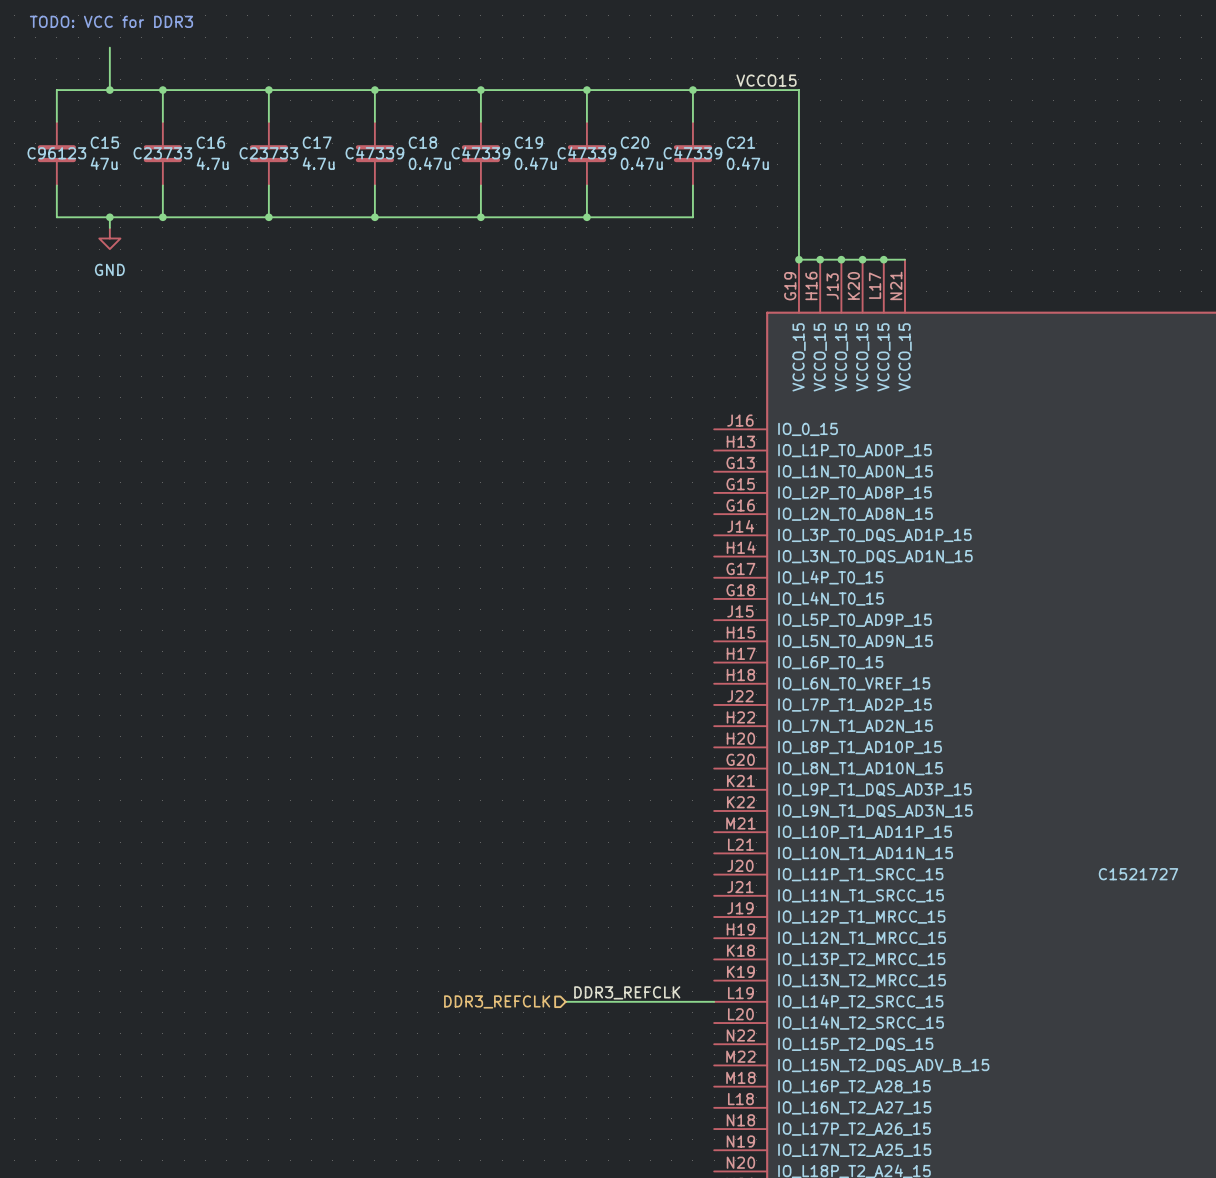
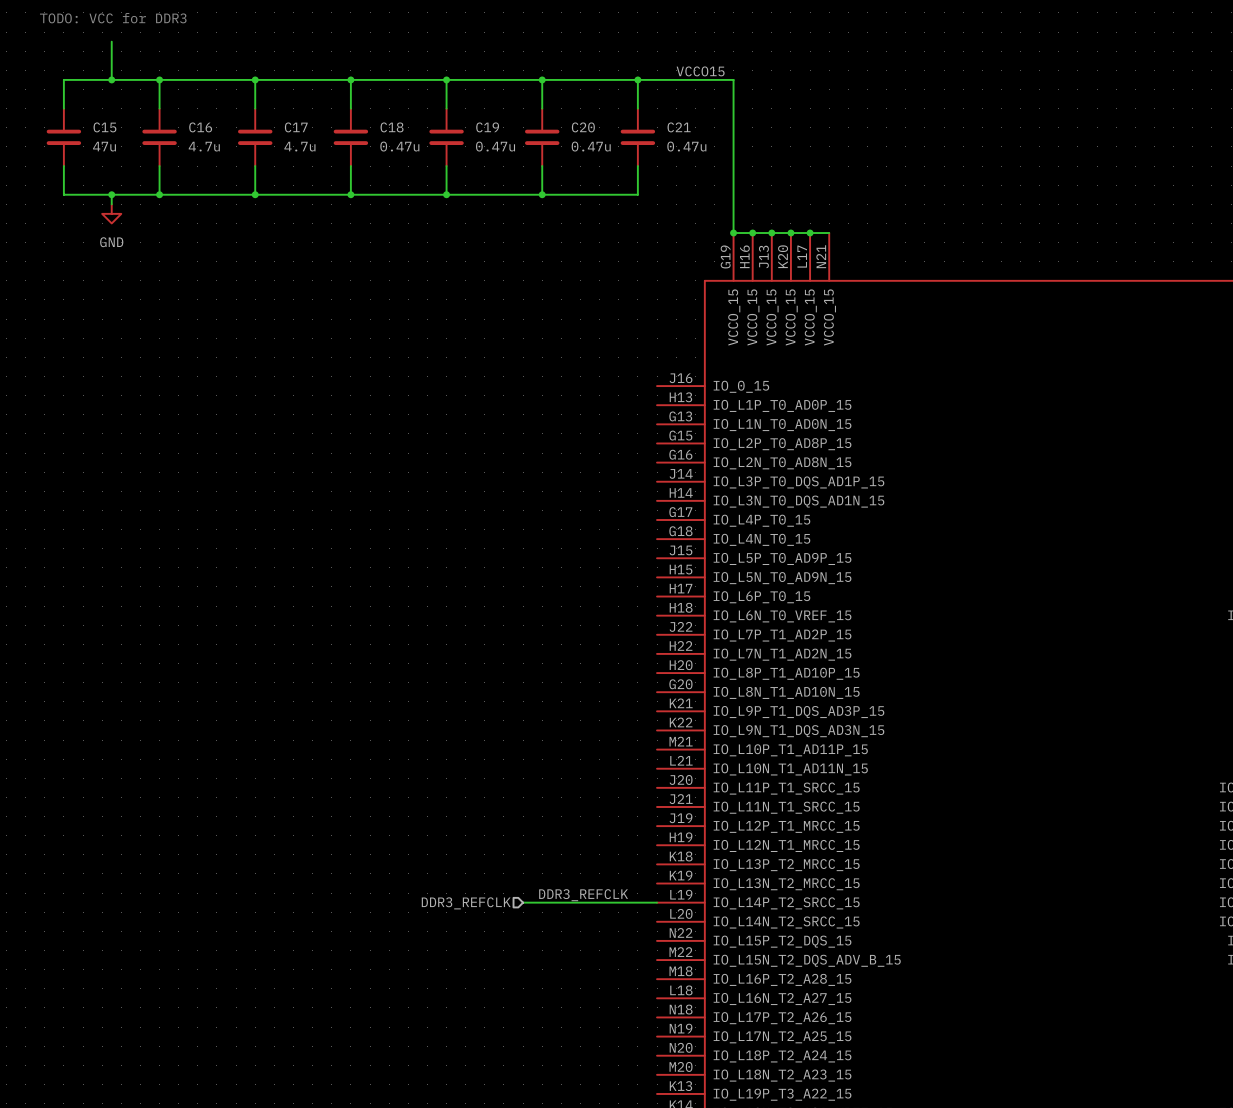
C15 text: C96123 (56, 153) -> none
C16 text: C23733 (162, 153) -> none
C17 text: C23733 (268, 153) -> none
C18 text: C47339 (374, 153) -> none
C19 text: C47339 (480, 153) -> none
C20 text: C47339 (586, 153) -> none
C21 text: C47339 (692, 153) -> none
part text: C1521727 (1138, 874) -> none

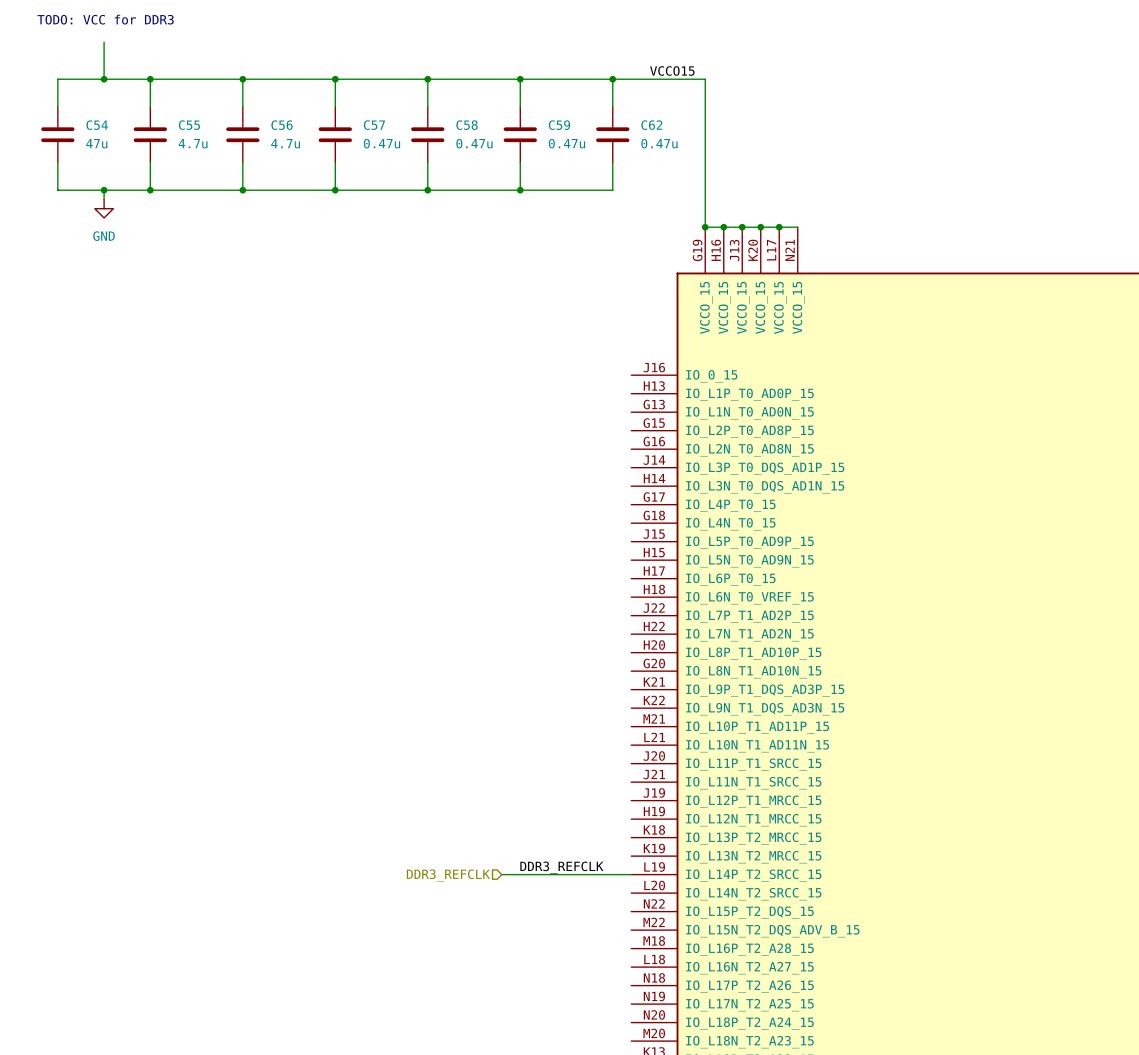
C15 name: C15 (104, 127) -> C54 (97, 125)
C16 name: C16 (200, 127) -> C55 (189, 125)
C17 name: C17 (296, 127) -> C56 (282, 125)
C18 name: C18 (392, 127) -> C57 (374, 125)
C19 name: C19 (487, 127) -> C58 (467, 125)
C20 name: C20 (583, 127) -> C59 (559, 125)
C21 name: C21 (679, 127) -> C62 (651, 125)

